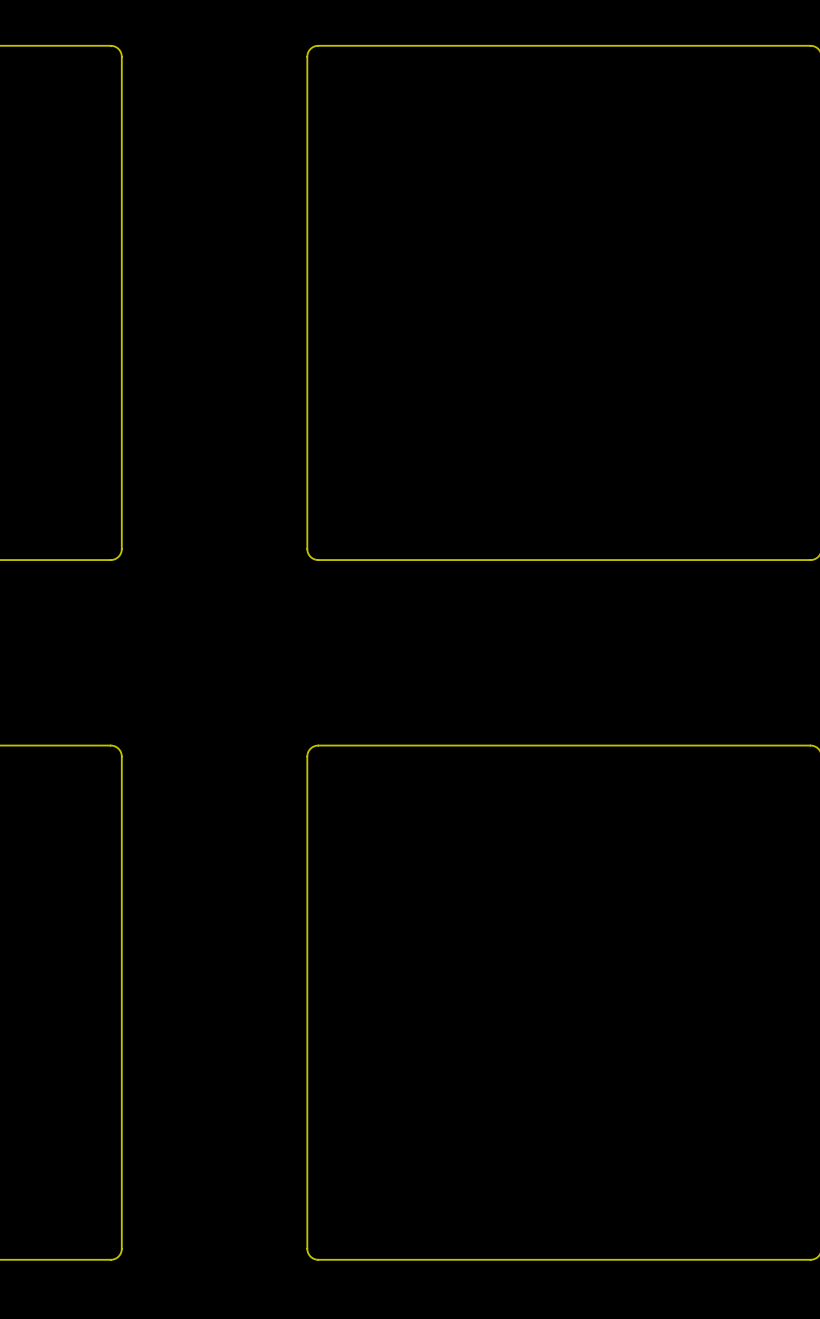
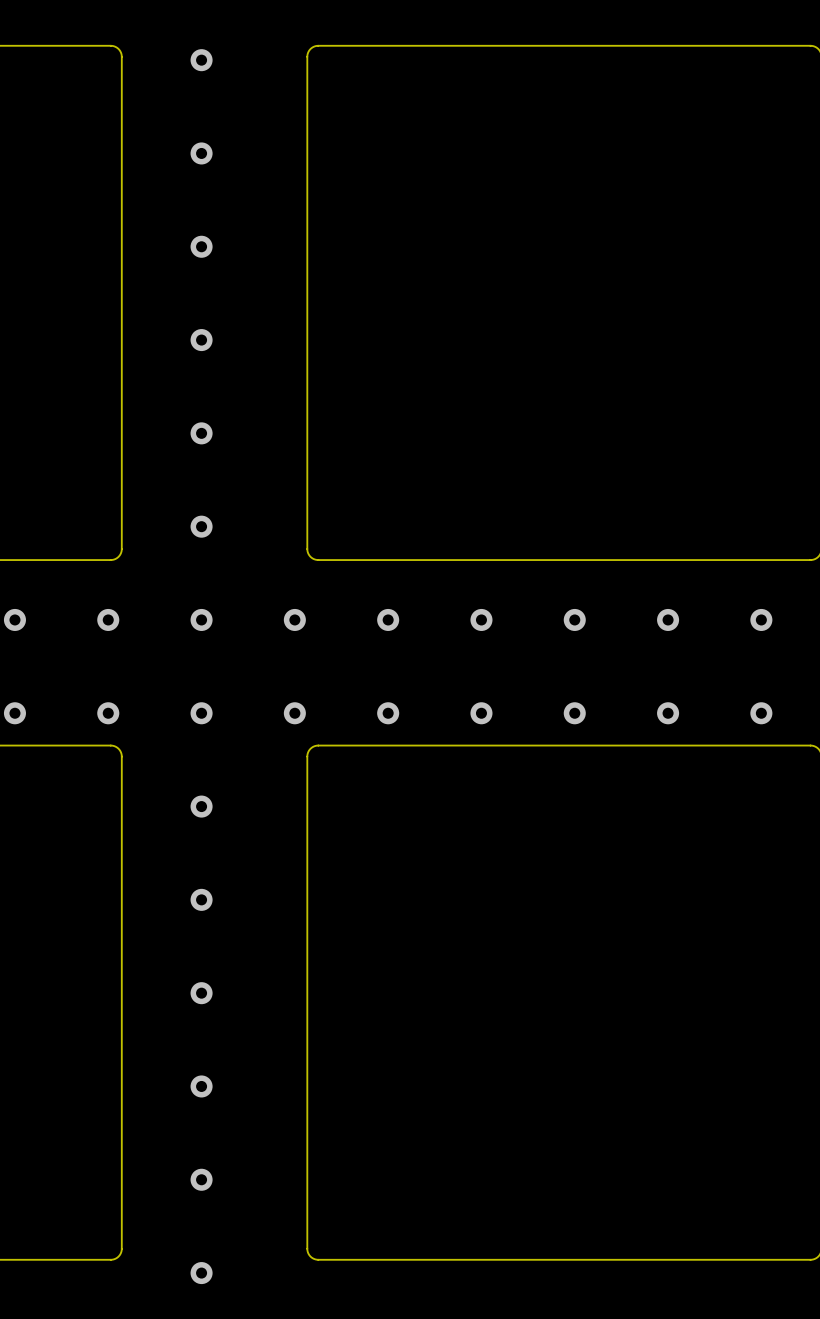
via: none -> (201, 60)
via: none -> (201, 153)
via: none -> (201, 246)
via: none -> (201, 340)
via: none -> (201, 433)
via: none -> (201, 526)
via: none -> (14, 619)
via: none -> (108, 619)
via: none -> (201, 619)
via: none -> (294, 619)
via: none -> (388, 619)
via: none -> (481, 619)
via: none -> (574, 619)
via: none -> (668, 619)
via: none -> (761, 619)
via: none -> (14, 713)
via: none -> (108, 713)
via: none -> (201, 713)
via: none -> (294, 713)
via: none -> (388, 713)
via: none -> (481, 713)
via: none -> (574, 713)
via: none -> (668, 713)
via: none -> (761, 713)
via: none -> (201, 806)
via: none -> (201, 899)
via: none -> (201, 993)
via: none -> (201, 1086)
via: none -> (201, 1179)
via: none -> (201, 1273)

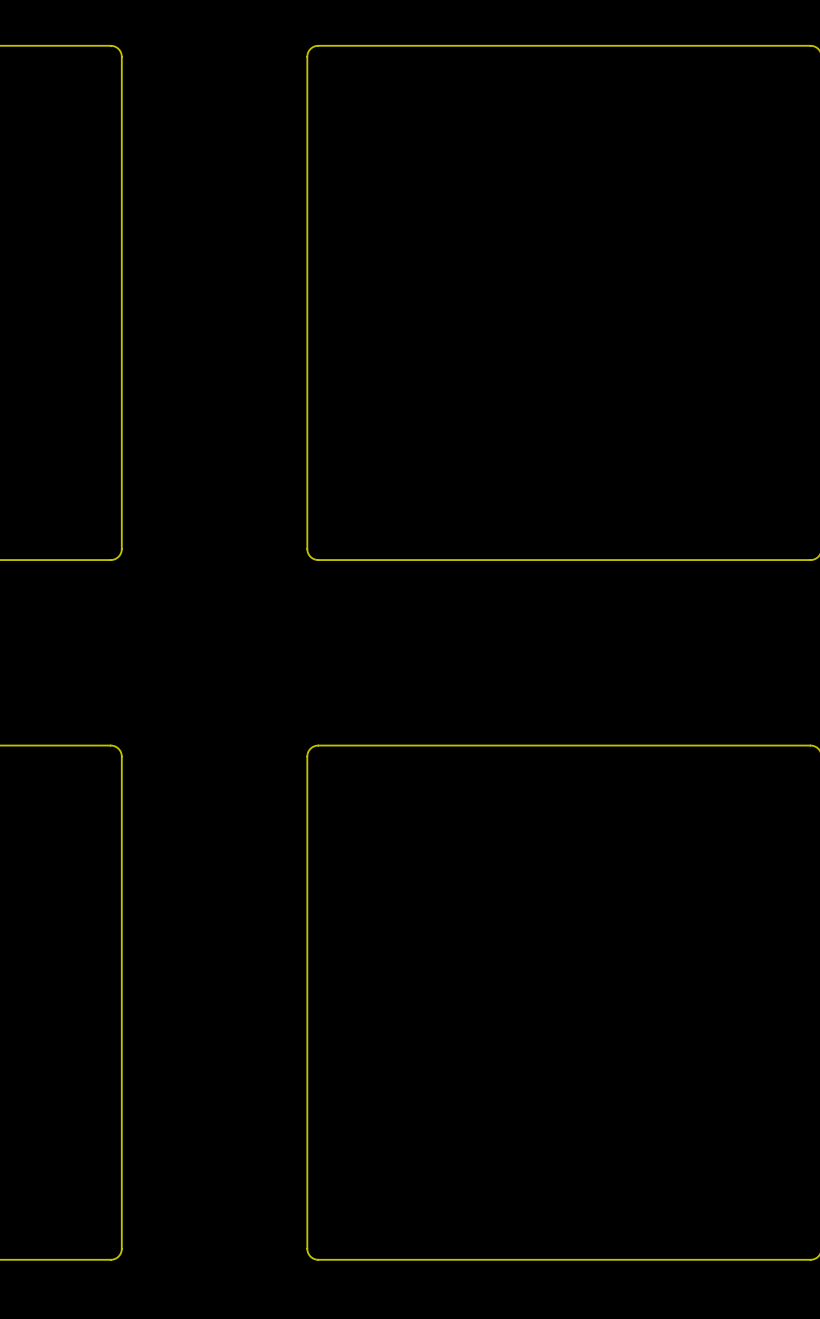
via: (201, 60) -> none
via: (201, 153) -> none
via: (201, 246) -> none
via: (201, 340) -> none
via: (201, 433) -> none
via: (201, 526) -> none
via: (14, 619) -> none
via: (108, 619) -> none
via: (201, 619) -> none
via: (294, 619) -> none
via: (388, 619) -> none
via: (481, 619) -> none
via: (574, 619) -> none
via: (668, 619) -> none
via: (761, 619) -> none
via: (14, 713) -> none
via: (108, 713) -> none
via: (201, 713) -> none
via: (294, 713) -> none
via: (388, 713) -> none
via: (481, 713) -> none
via: (574, 713) -> none
via: (668, 713) -> none
via: (761, 713) -> none
via: (201, 806) -> none
via: (201, 899) -> none
via: (201, 993) -> none
via: (201, 1086) -> none
via: (201, 1179) -> none
via: (201, 1273) -> none

